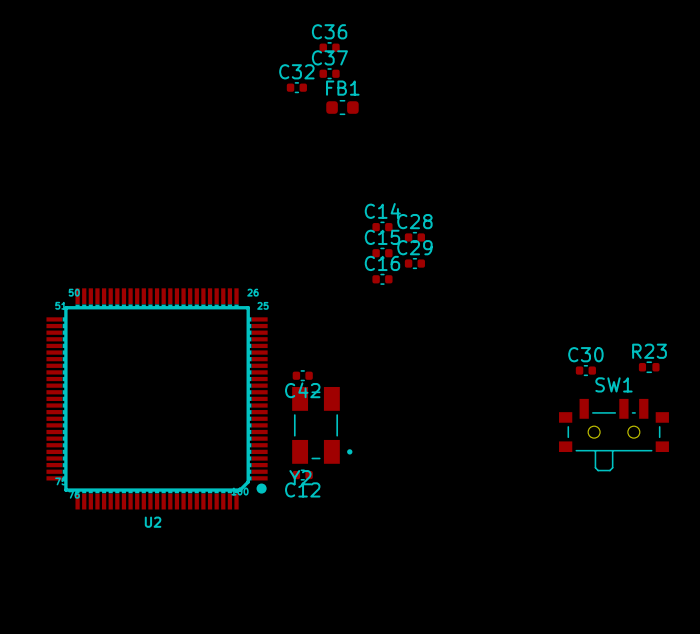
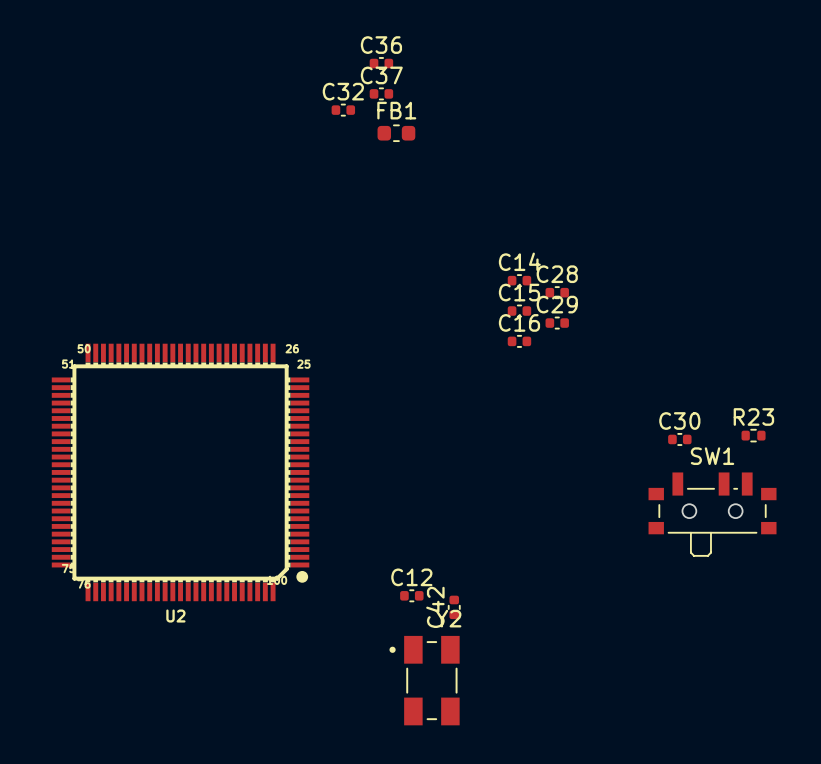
C14 position: (382, 227) -> (519, 280)
C28 position: (414, 237) -> (557, 292)
C15 position: (382, 253) -> (519, 311)
C29 position: (414, 263) -> (557, 323)
C16 position: (382, 279) -> (519, 341)
C42 rotation: 0° (302, 375) -> 90° clockwise (454, 607)
C42 position: (302, 375) -> (454, 607)
Y2 rotation: 0° (322, 425) -> 180° (424, 680)
Y2 position: (322, 425) -> (424, 680)
C12 position: (302, 475) -> (411, 595)
C12 name position: C12 (302, 489) -> C12 (411, 577)

